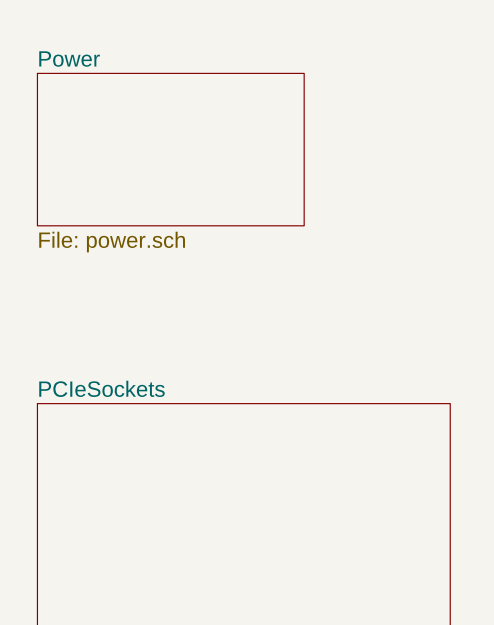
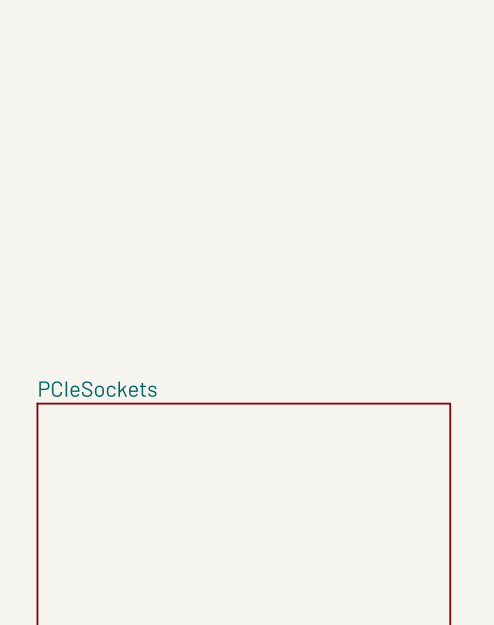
sheet Power: File: power.sch (170, 149) -> none

